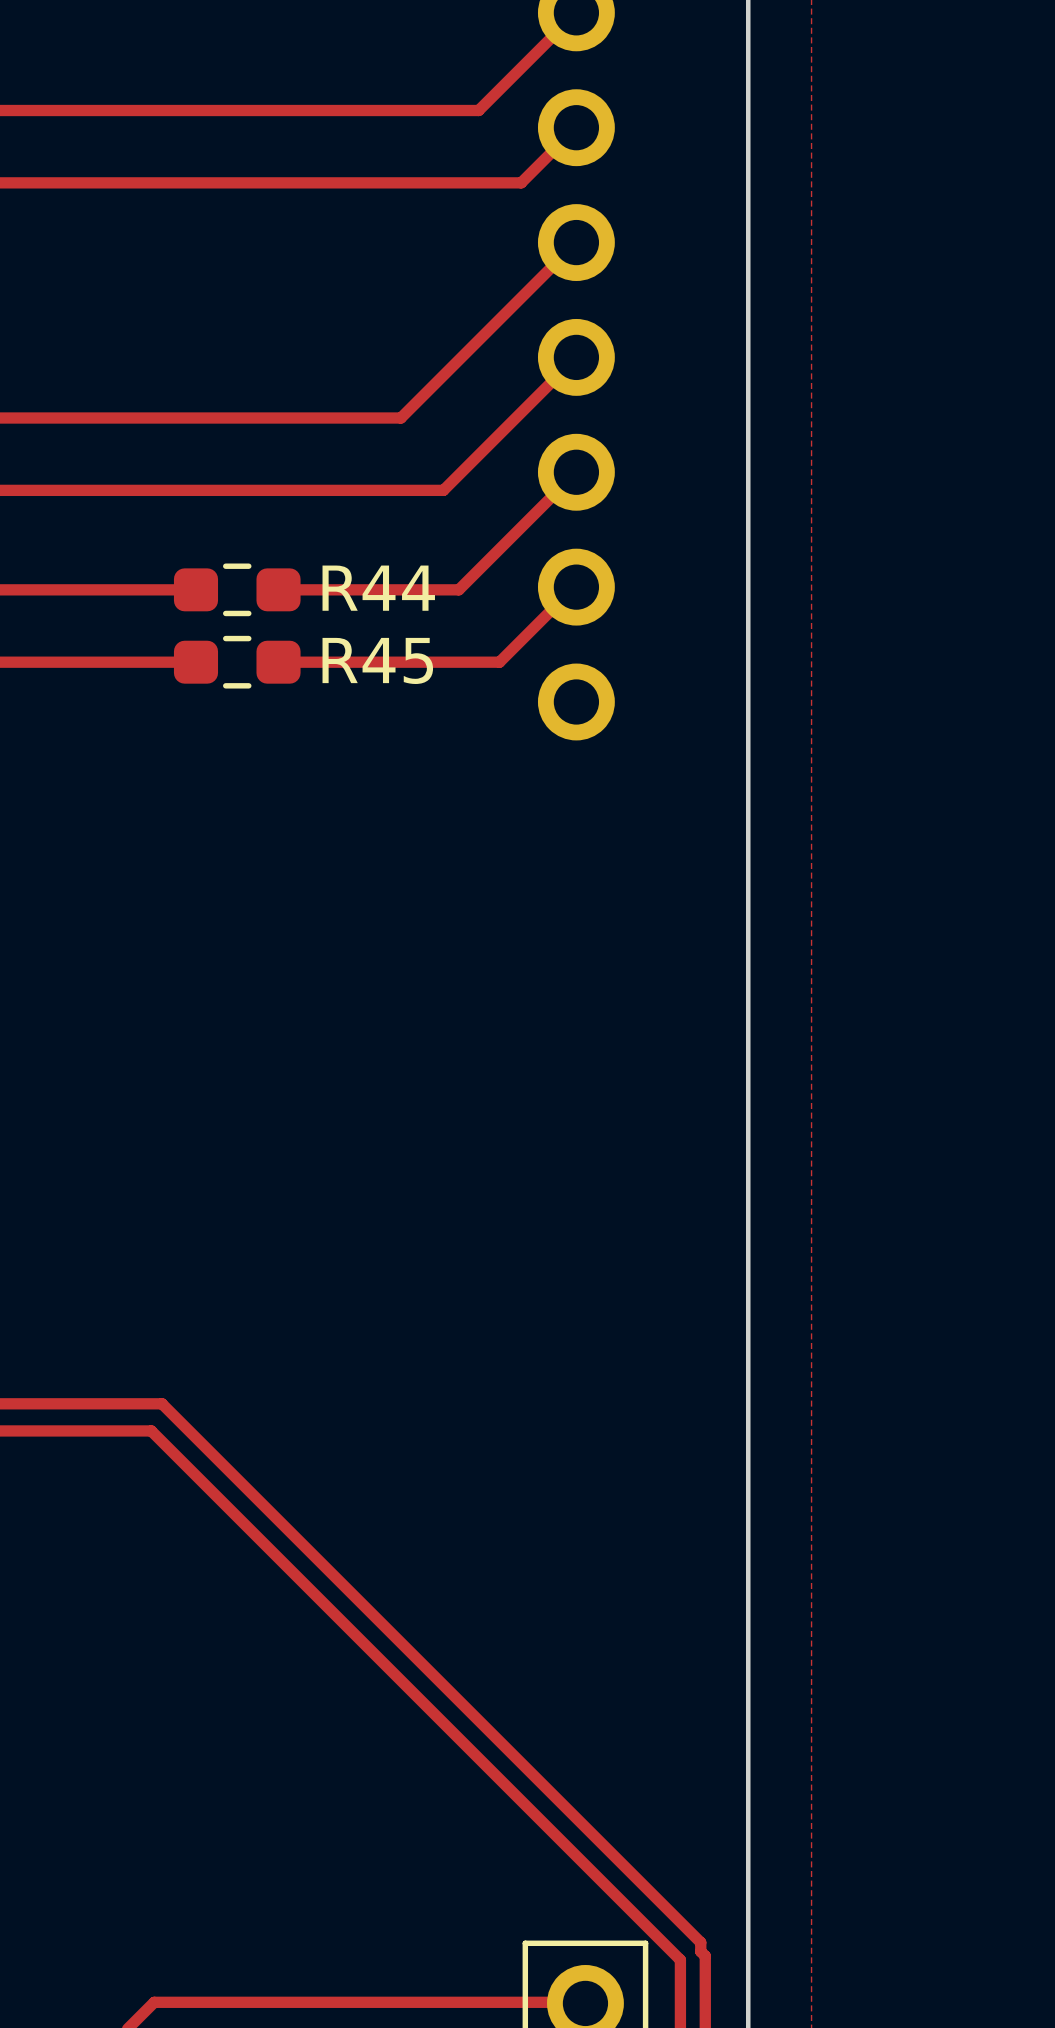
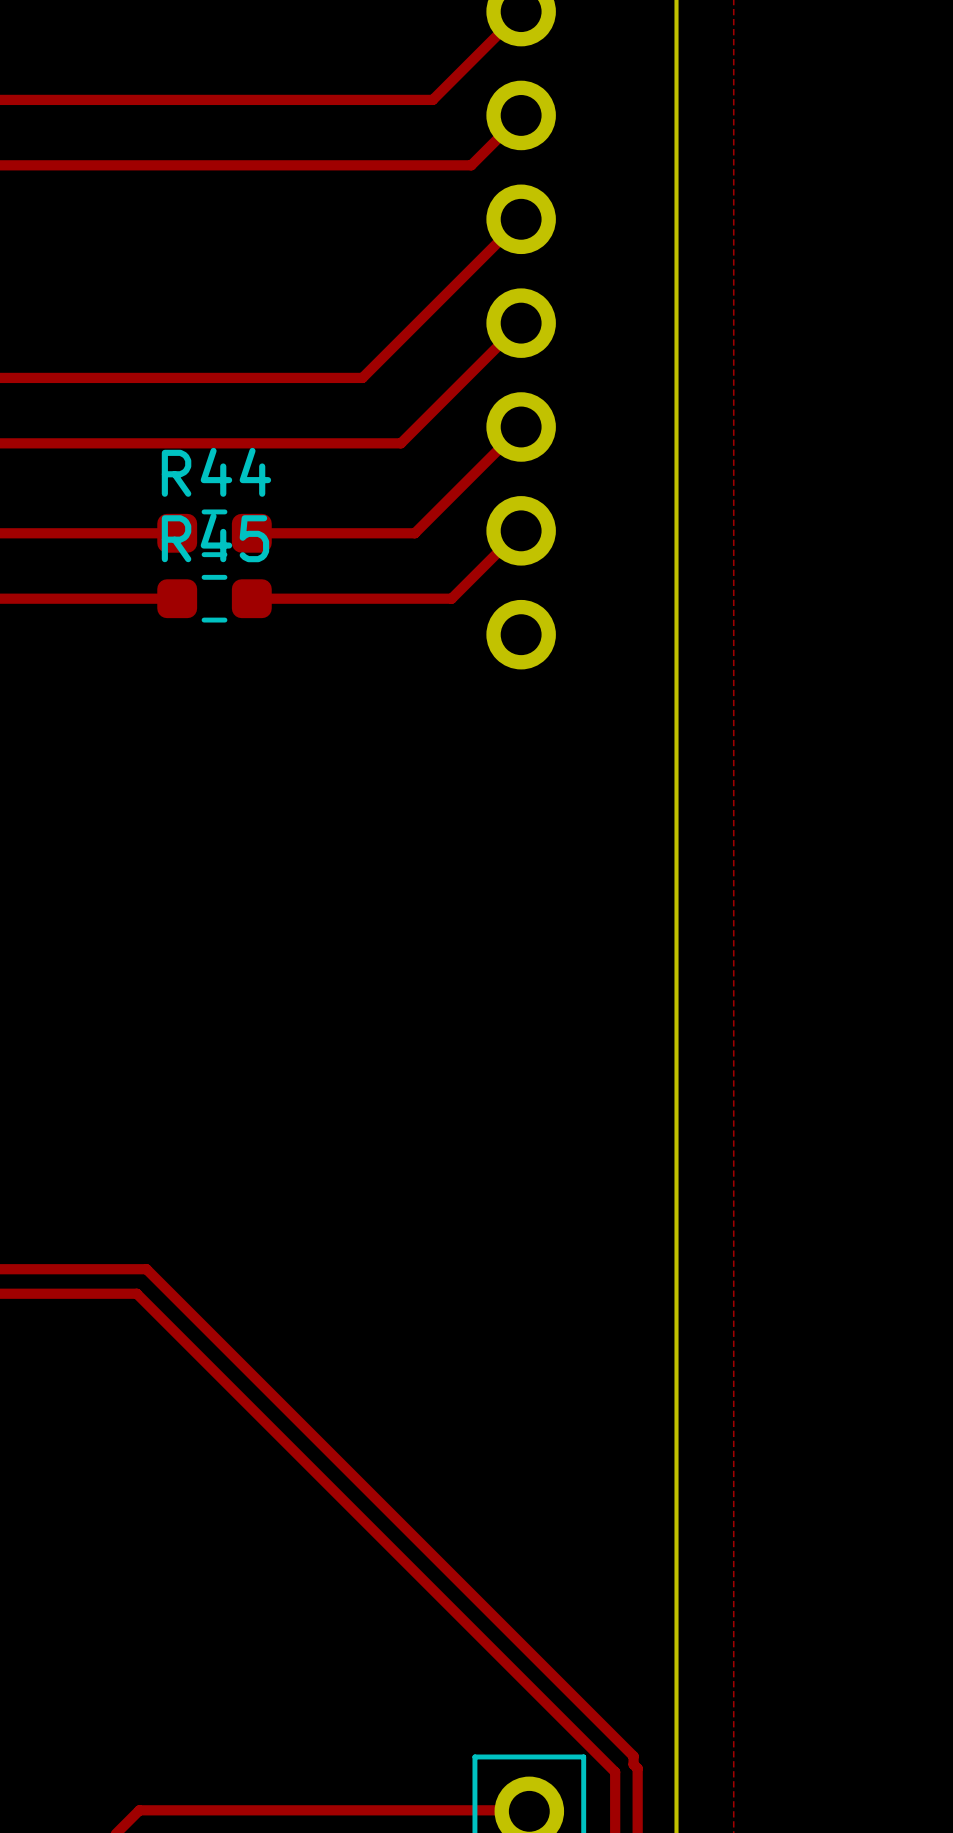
R44 name position: R44 (378, 588) -> R44 (216, 472)
R45 name position: R45 (377, 660) -> R45 (215, 537)

